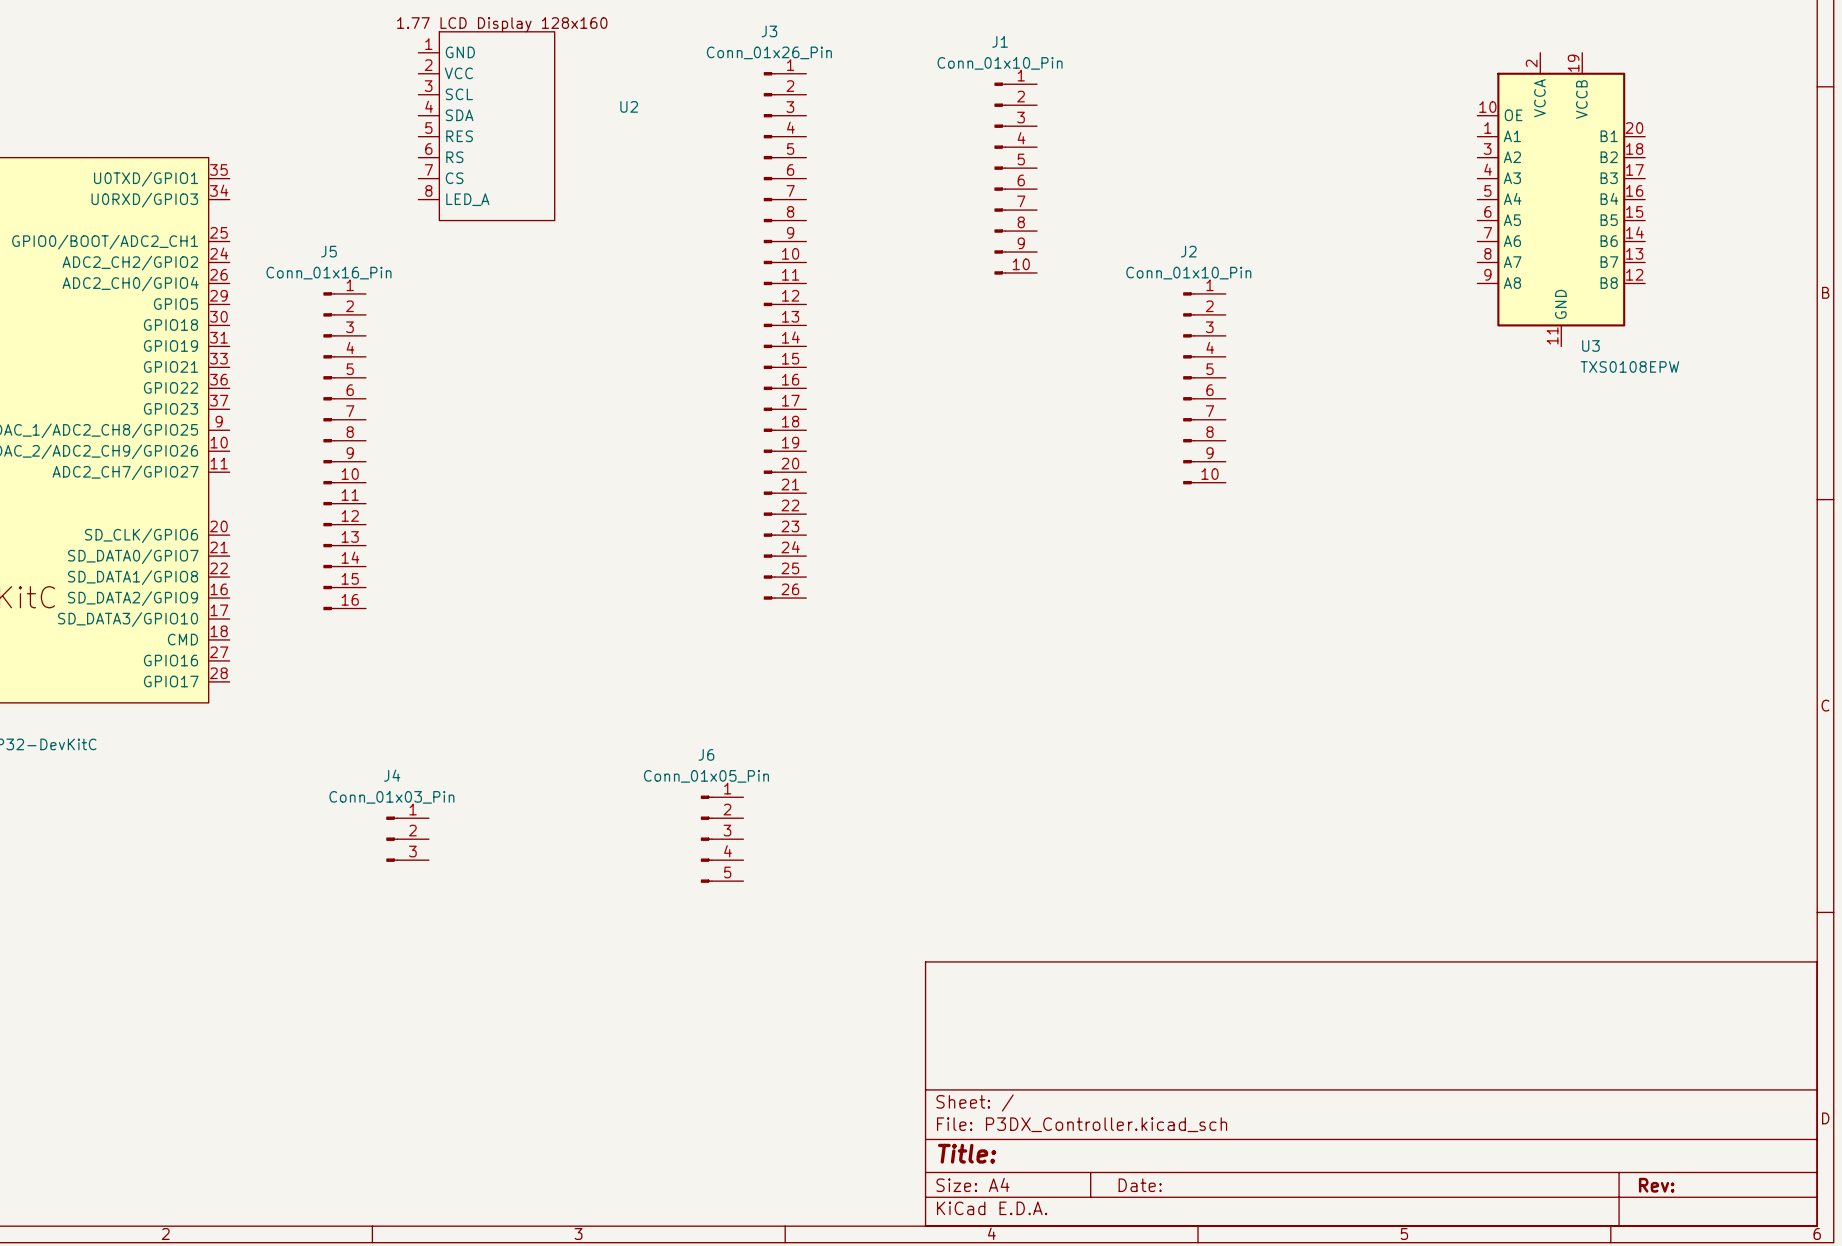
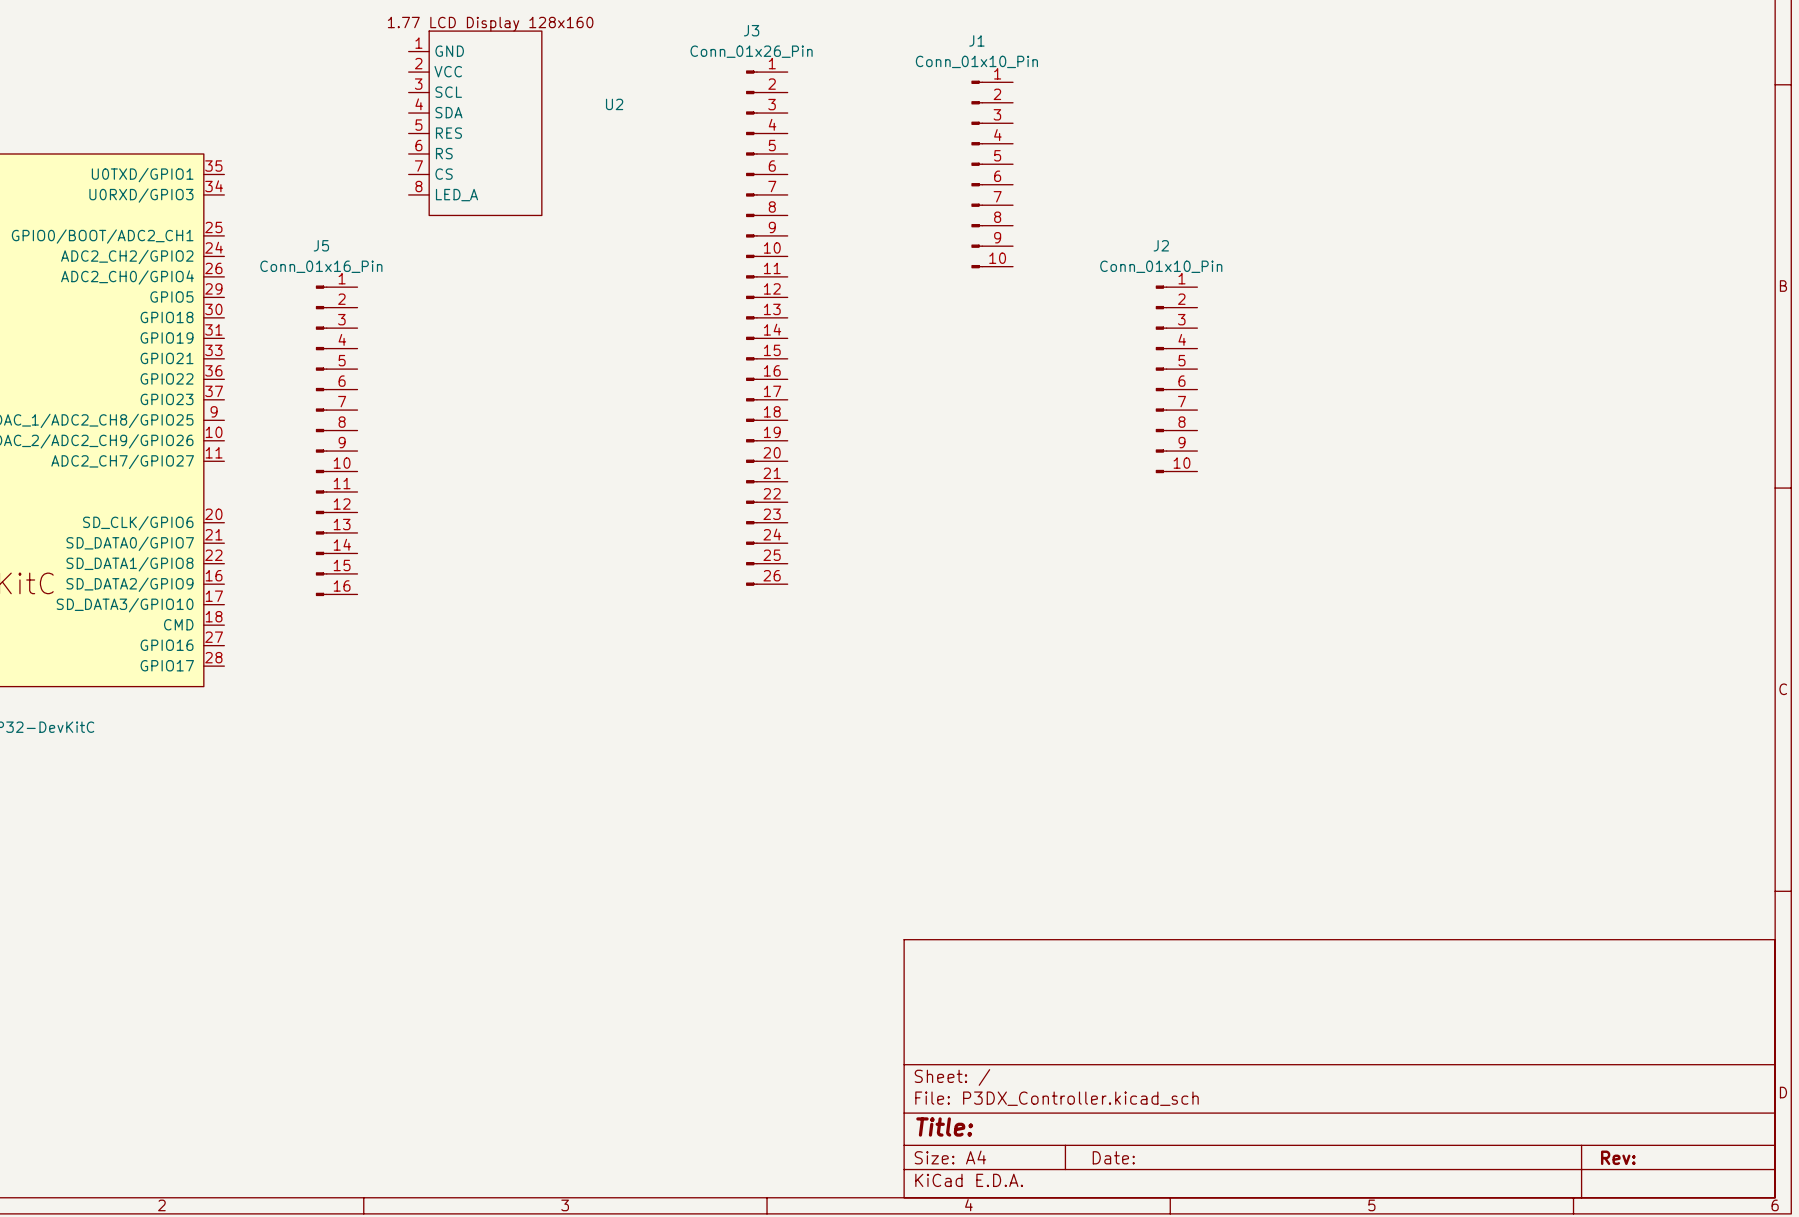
U3: TXS0108EPW (1561, 199) -> none
J4: Conn_01x03_Pin (407, 839) -> none
J6: Conn_01x05_Pin (722, 839) -> none

